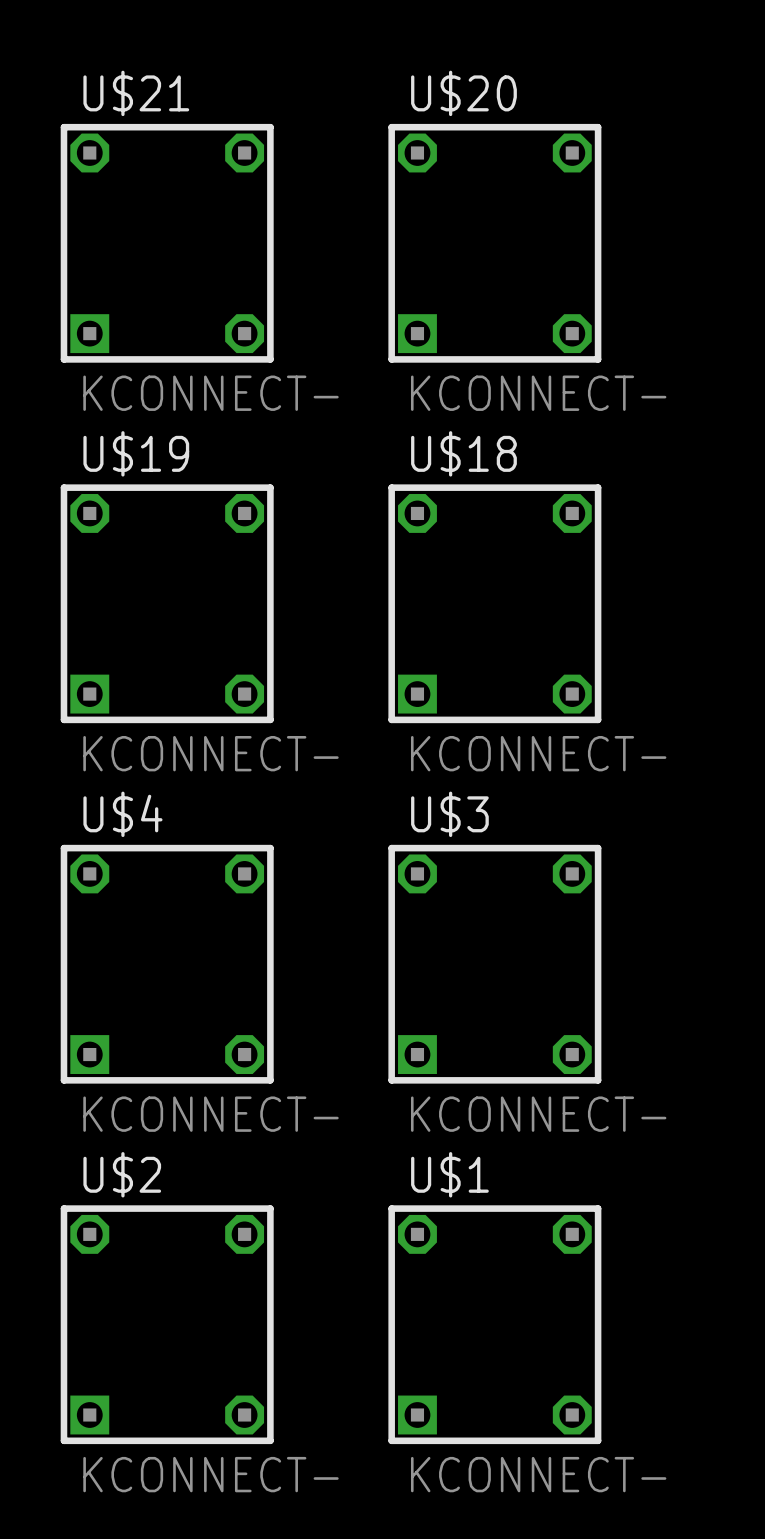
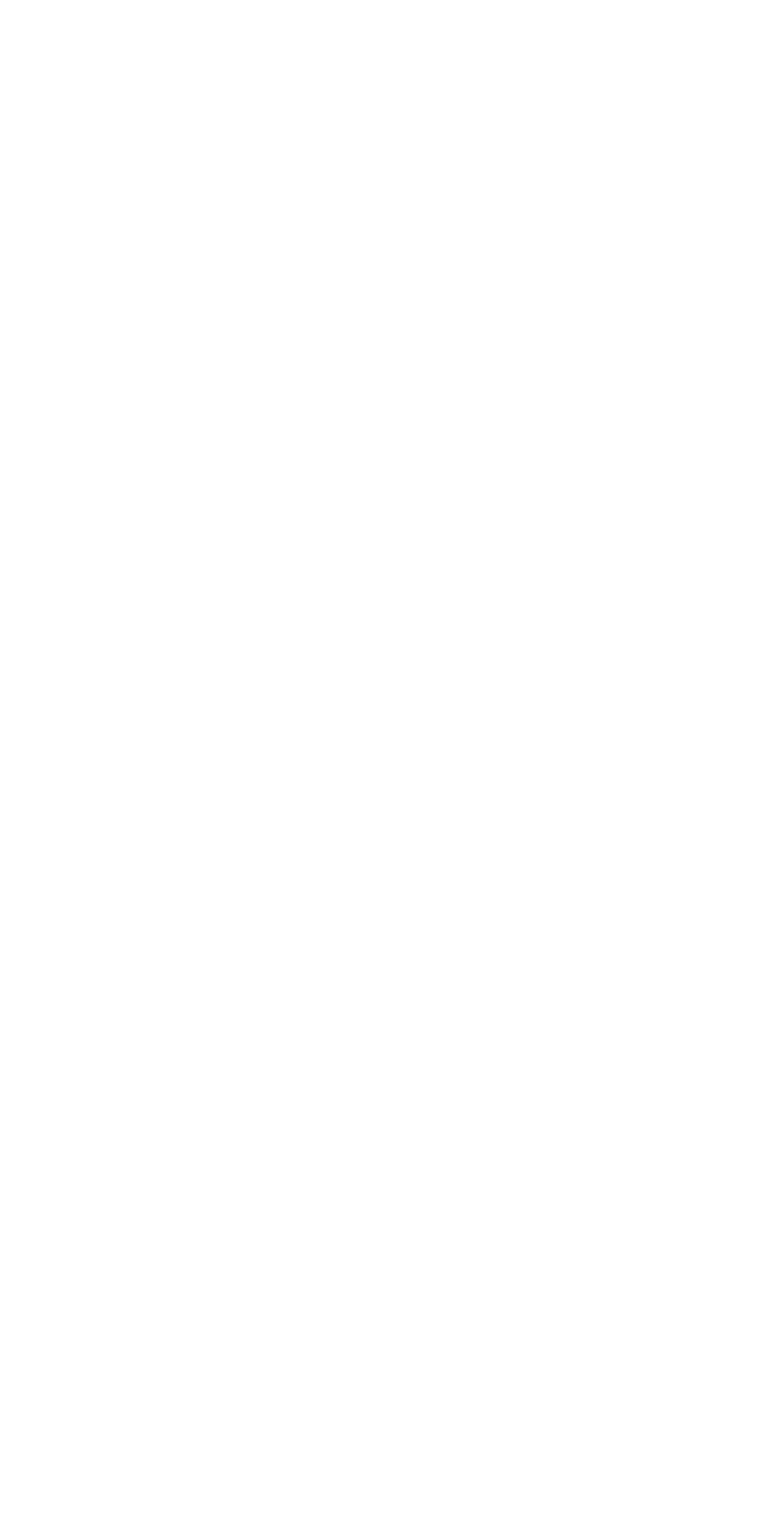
U$21: KCONNECT- (167, 243) -> none
U$20: KCONNECT- (494, 243) -> none
U$19: KCONNECT- (167, 603) -> none
U$18: KCONNECT- (494, 603) -> none
U$4: KCONNECT- (167, 964) -> none
U$3: KCONNECT- (494, 964) -> none
U$2: KCONNECT- (167, 1324) -> none
U$1: KCONNECT- (494, 1324) -> none

